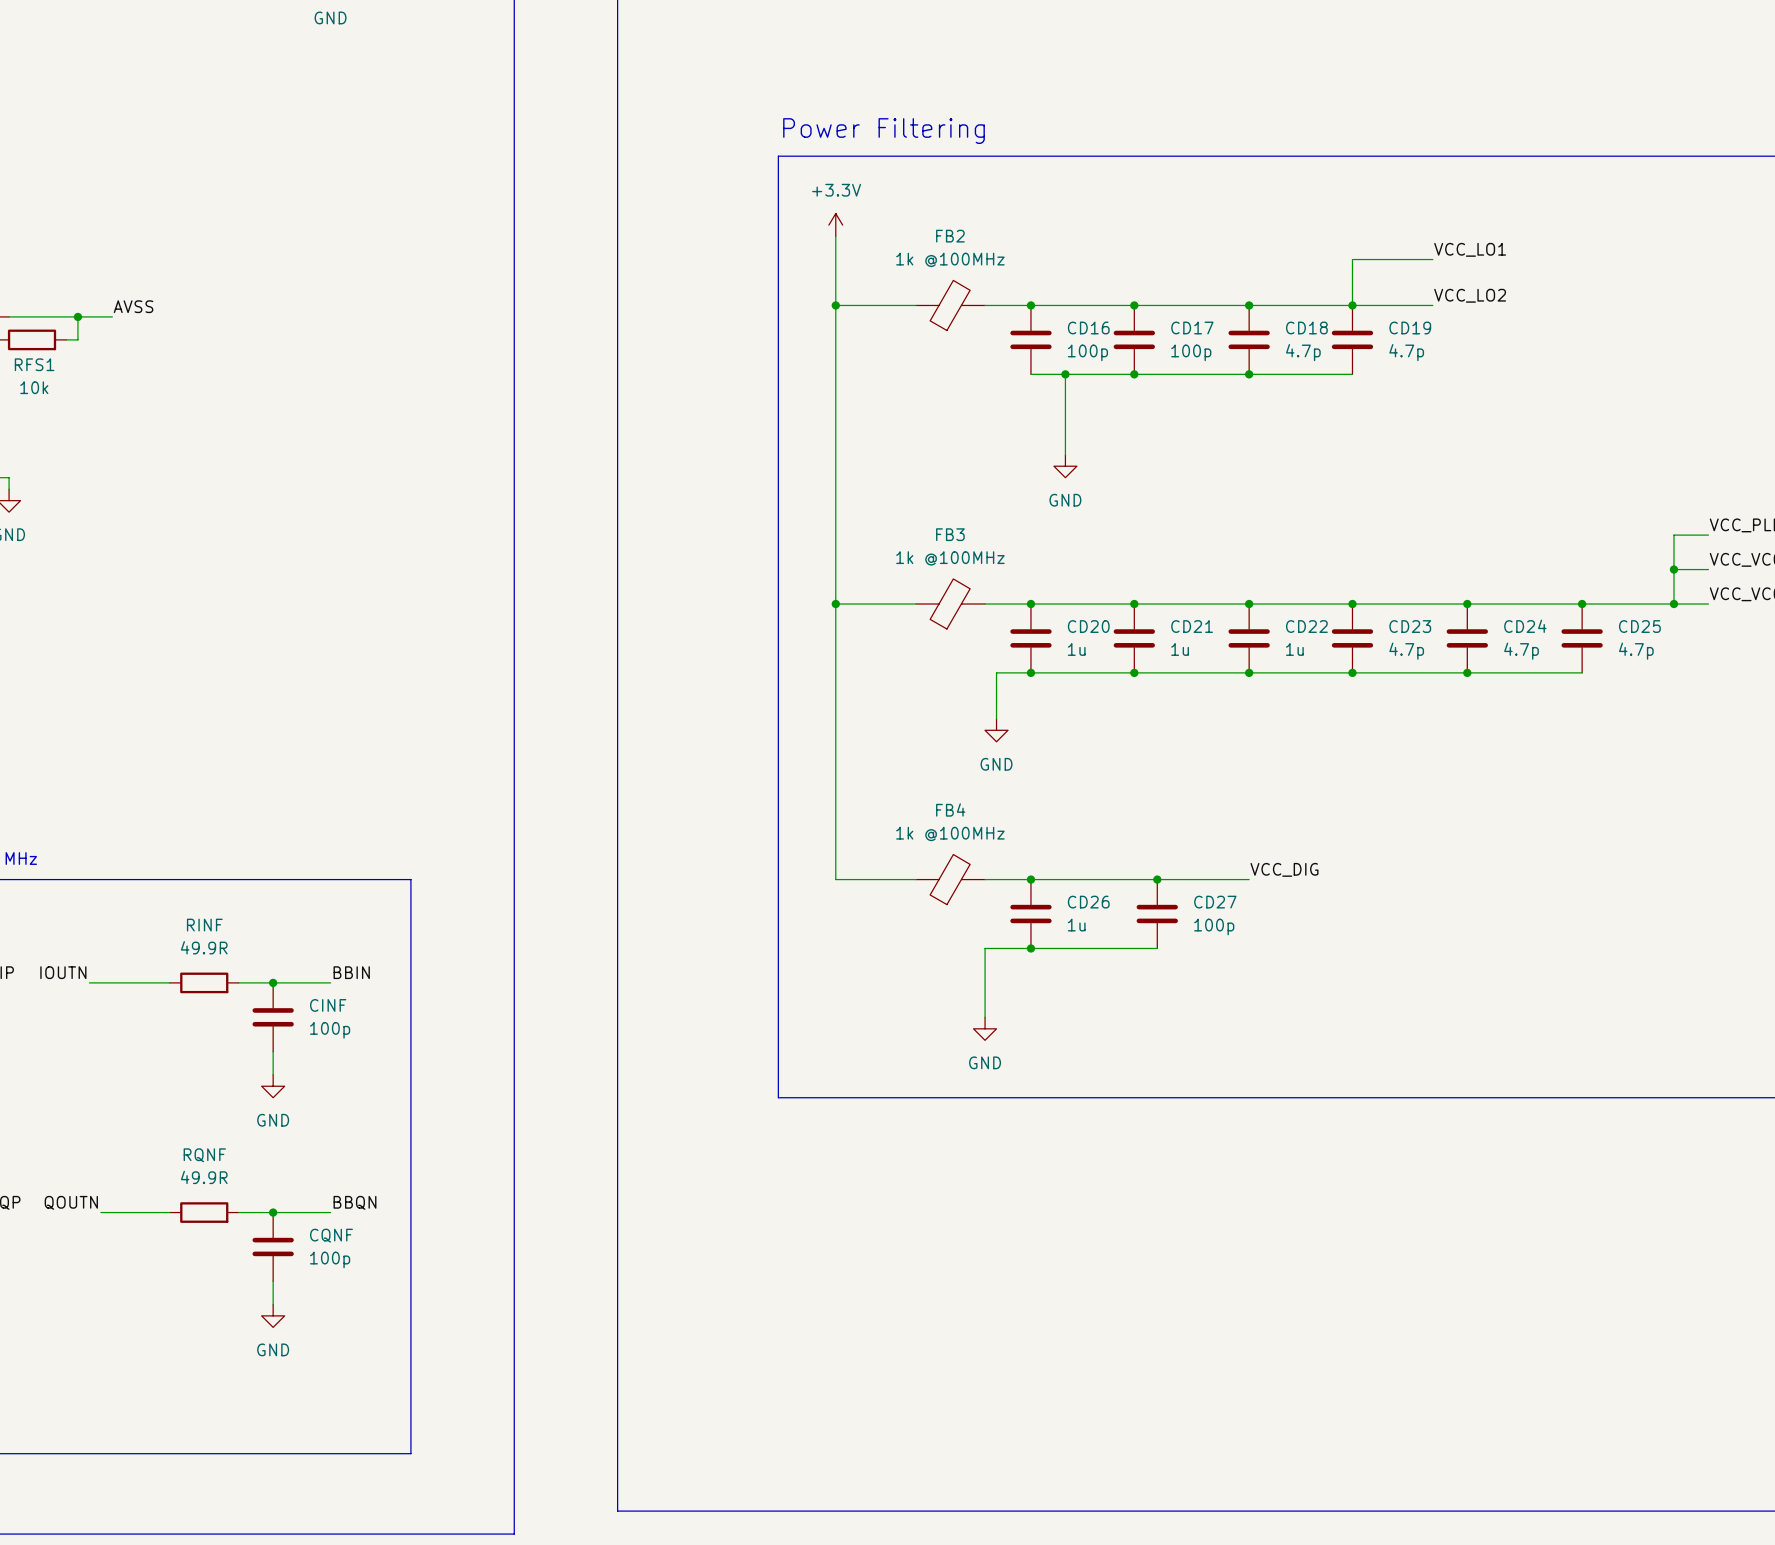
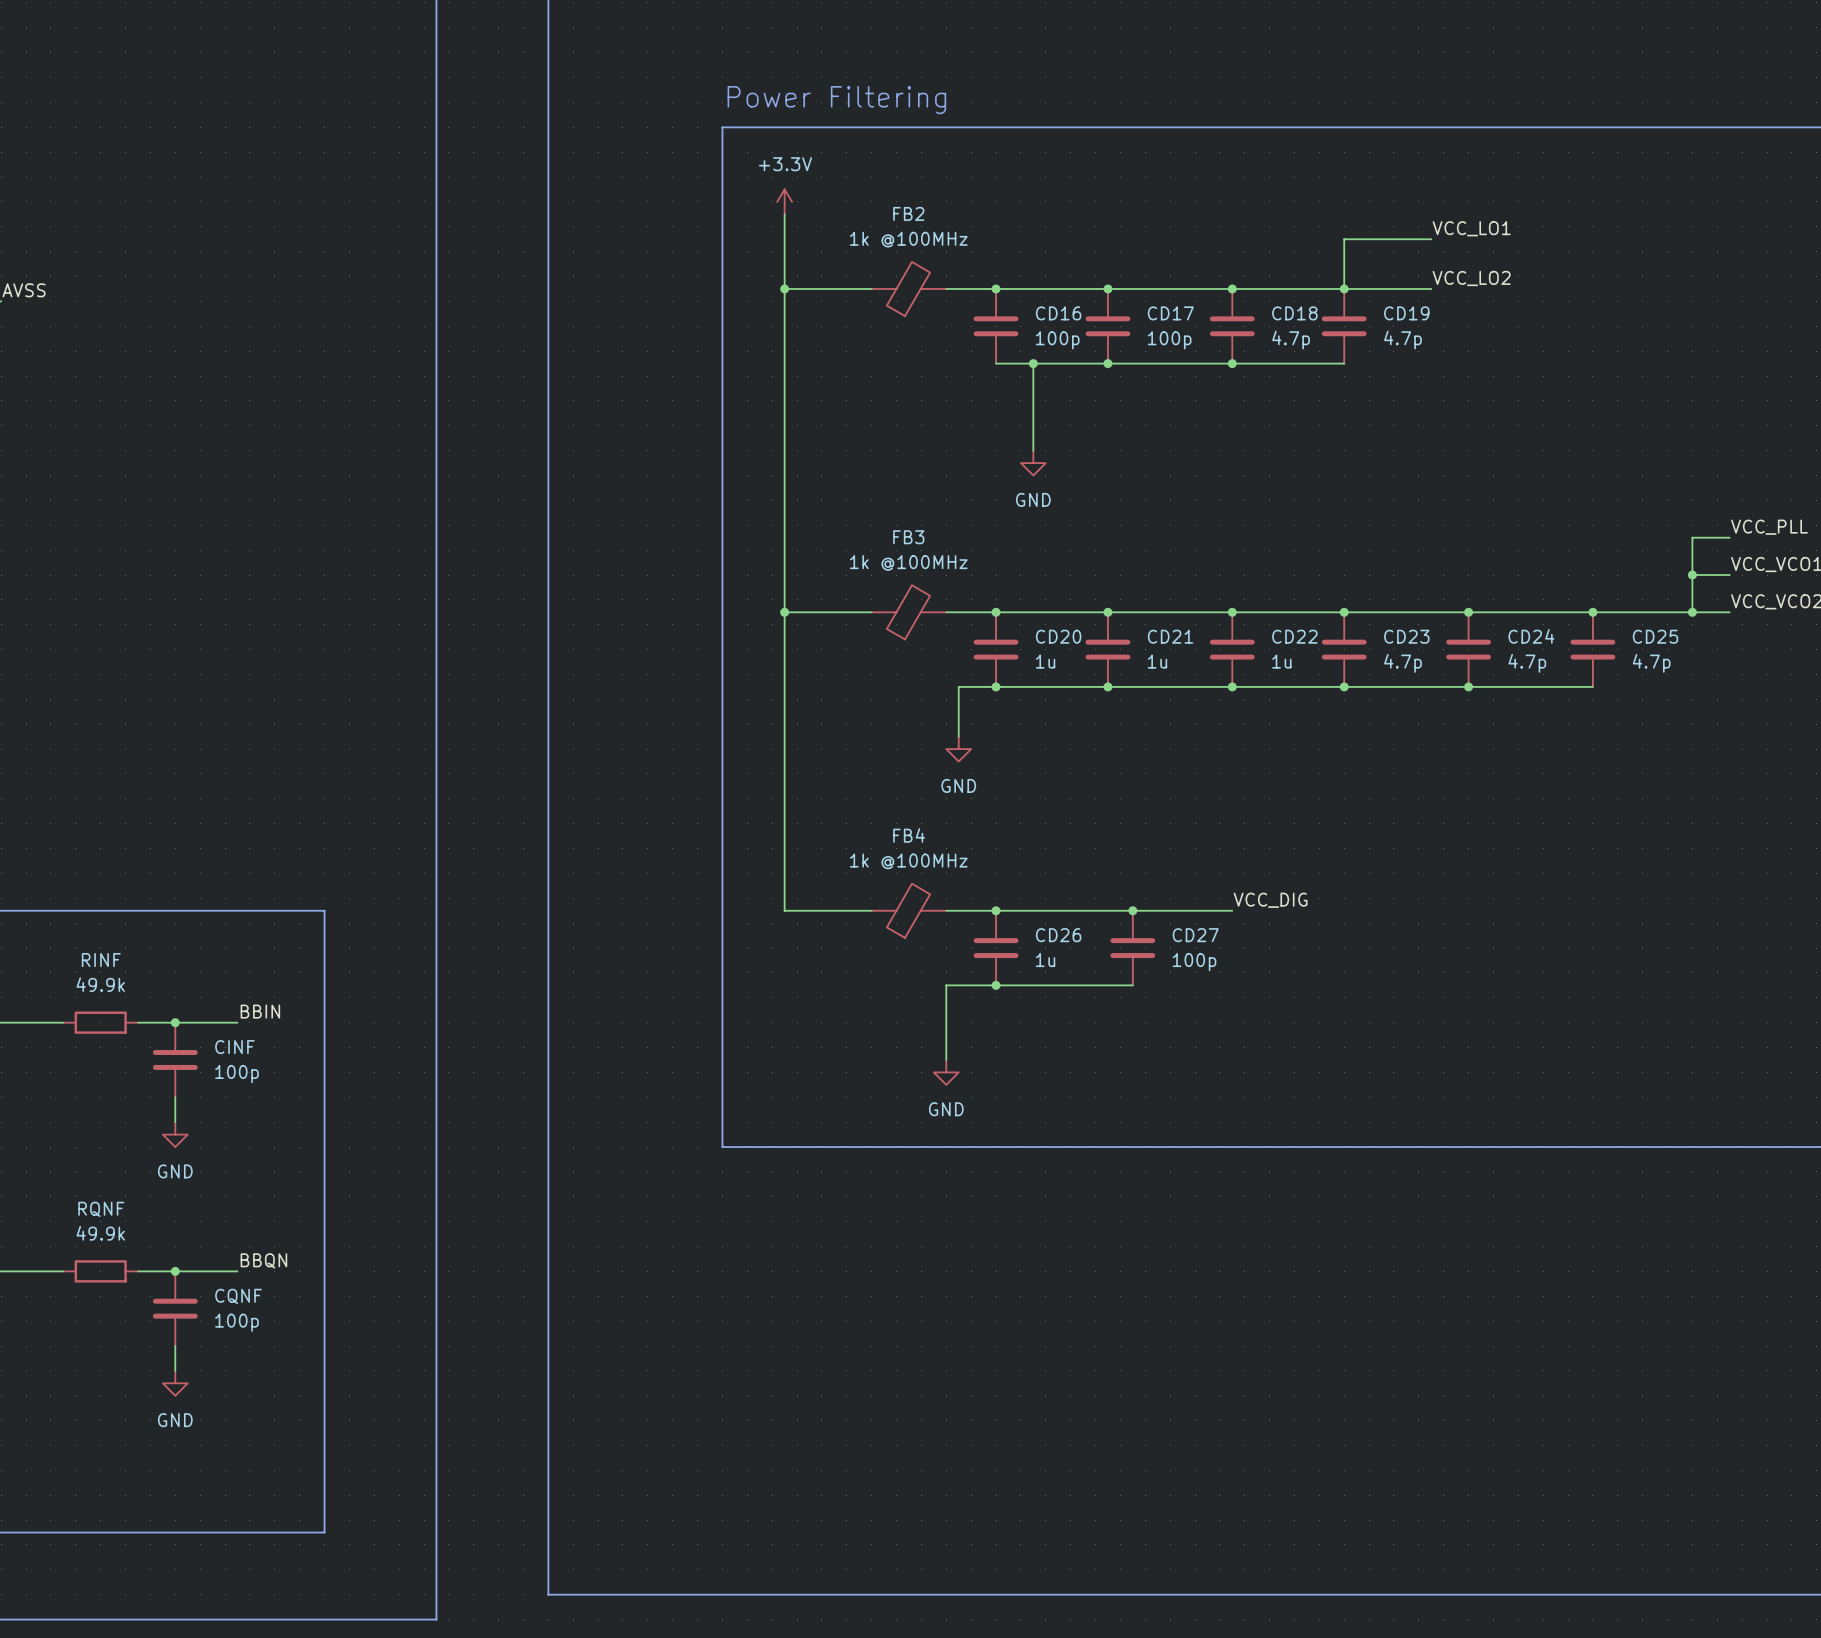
RINF value: 49.9R (204, 947) -> 49.9k (100, 984)
RQNF value: 49.9R (204, 1177) -> 49.9k (100, 1233)

